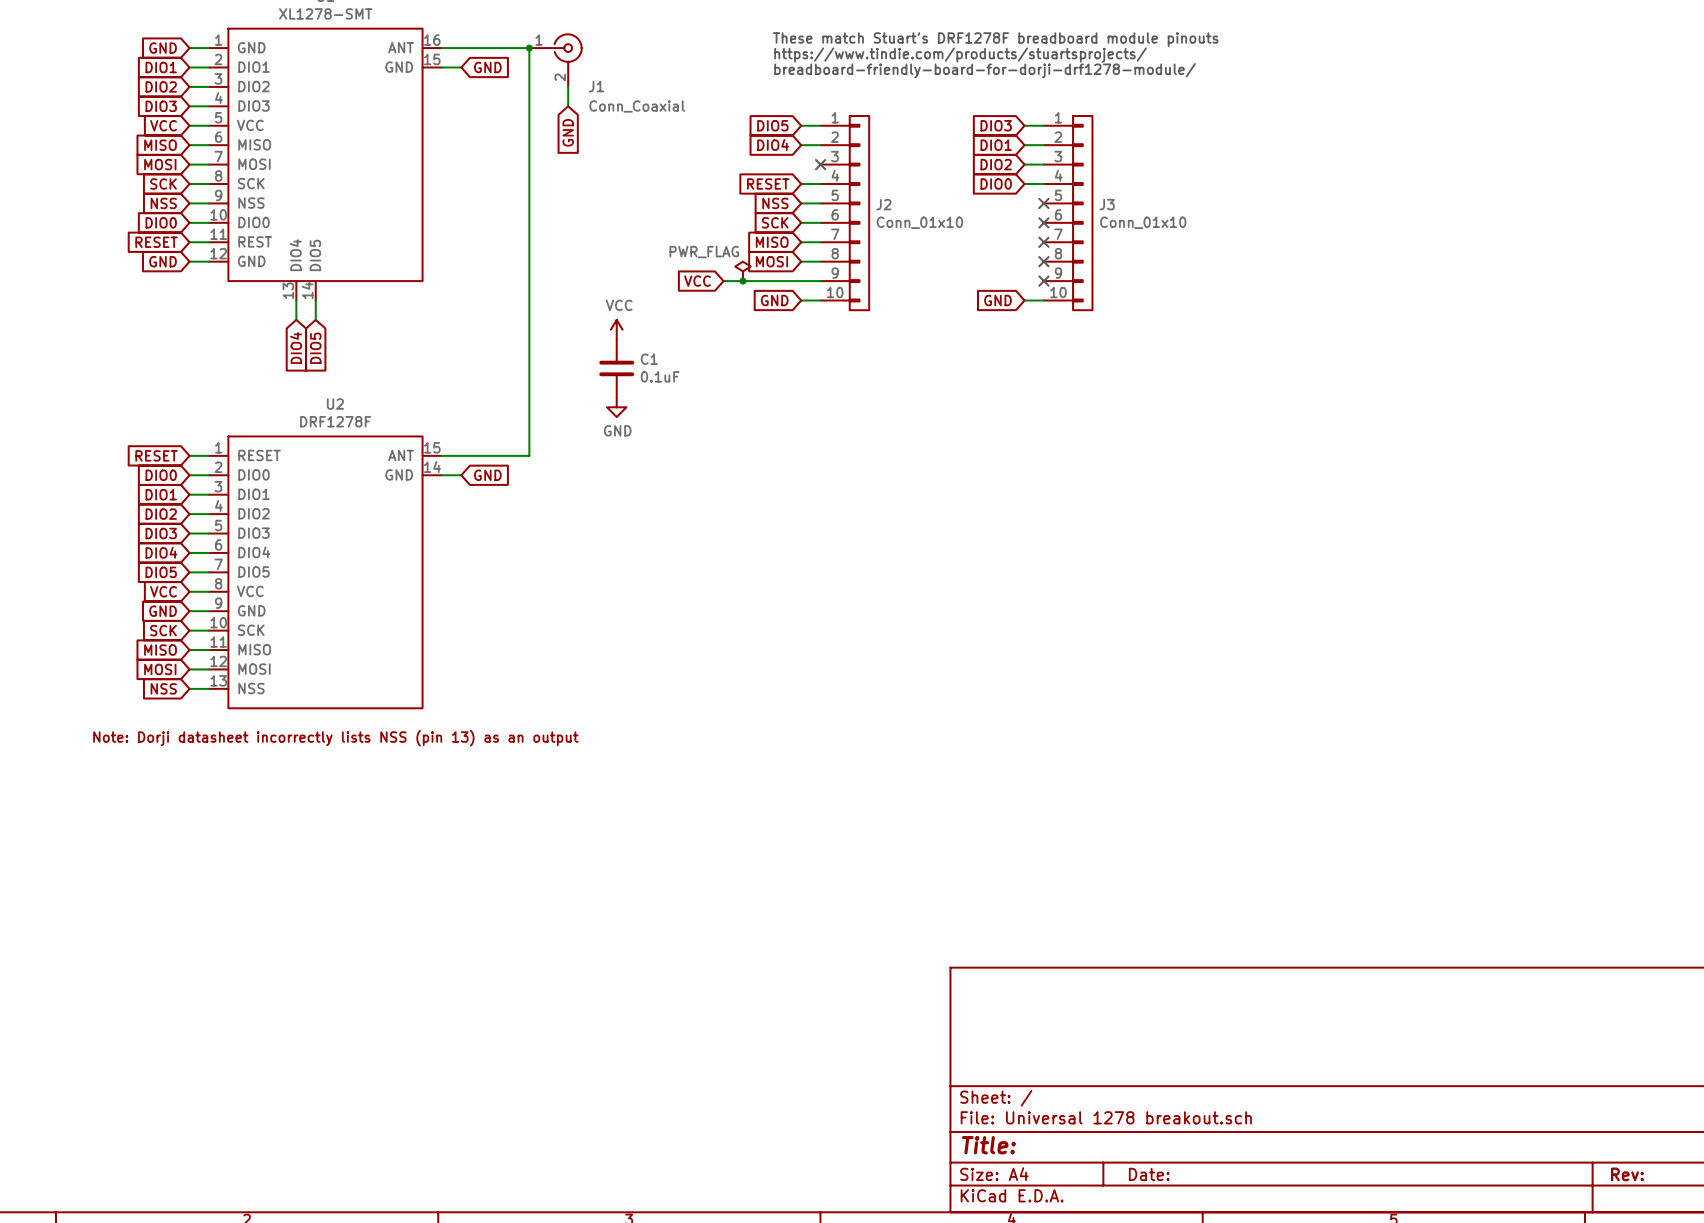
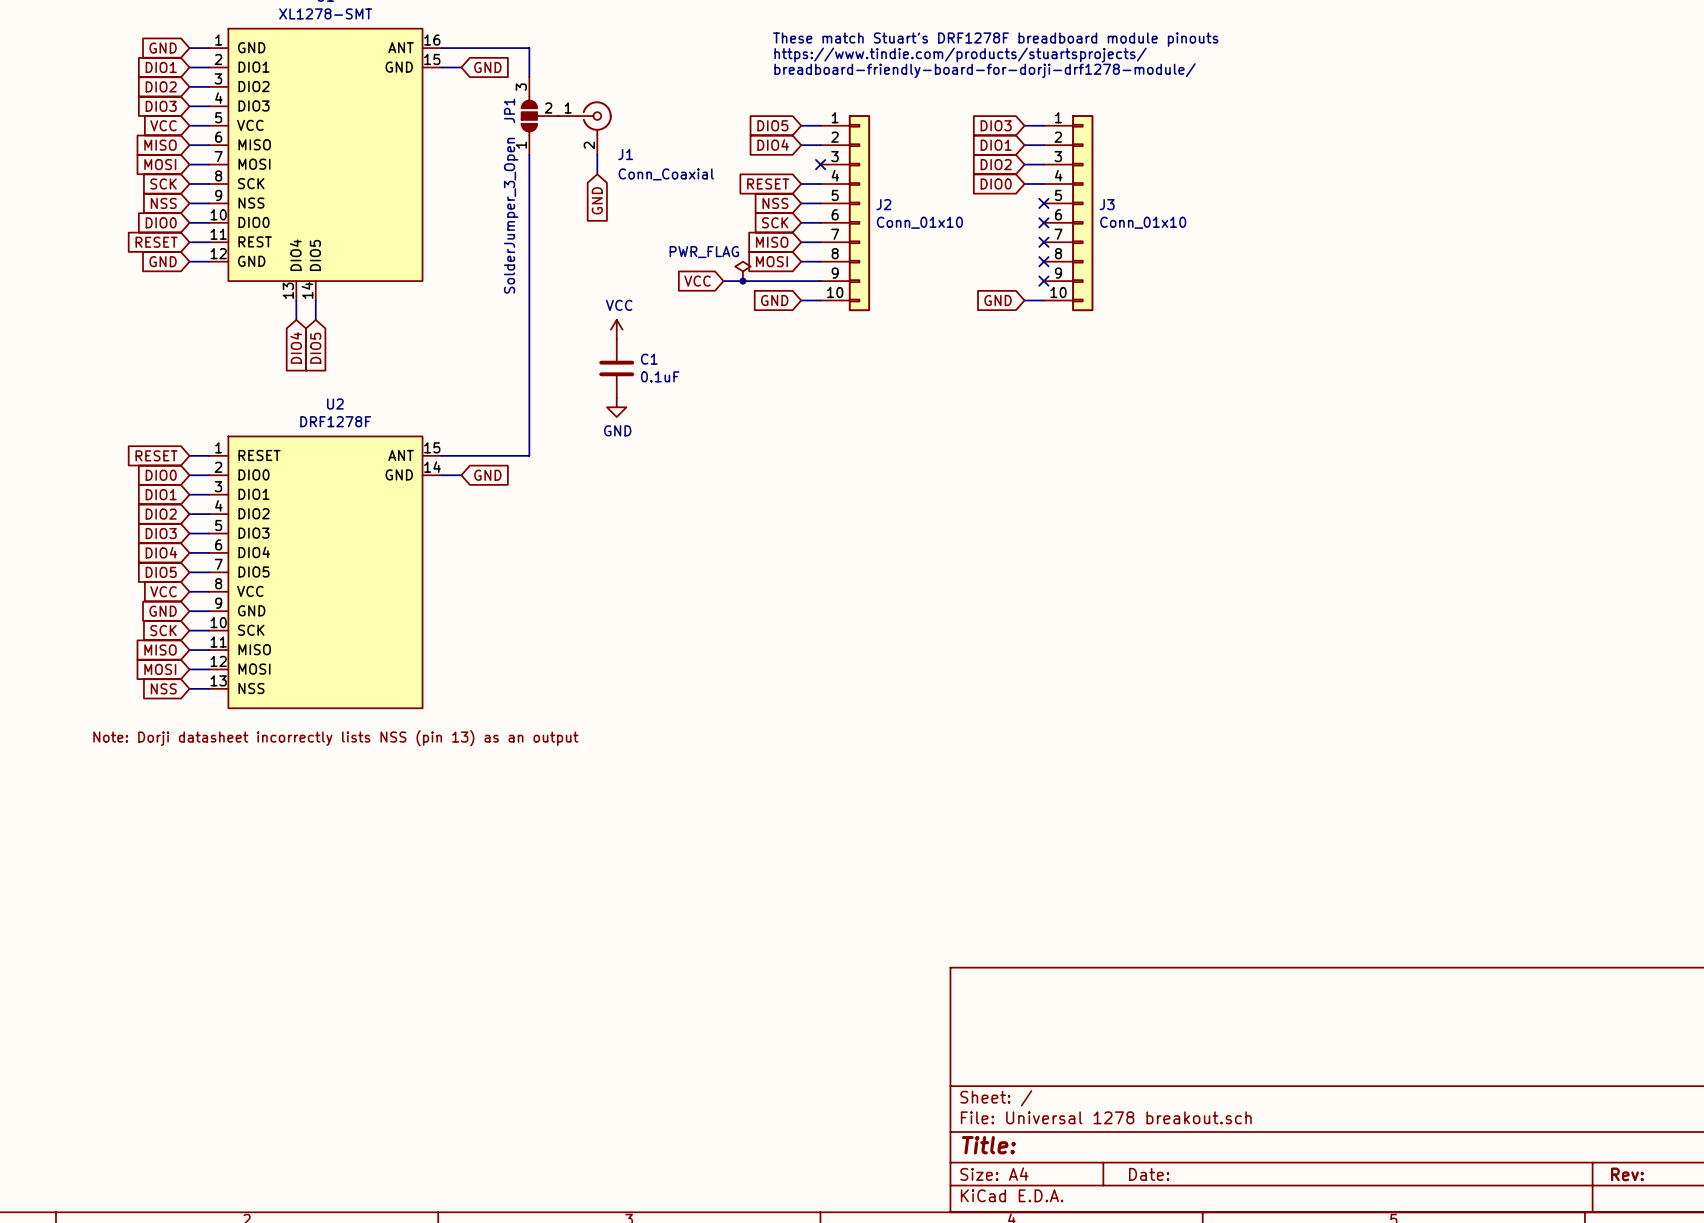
junction: (529, 48) -> none
J1 position: (556, 60) -> (585, 128)
wire: (568, 86) (568, 106) -> (597, 154) (597, 174)
JP1: none -> SolderJumper_3_Open (540, 116)
global label position: GND (568, 132) -> GND (597, 200)

